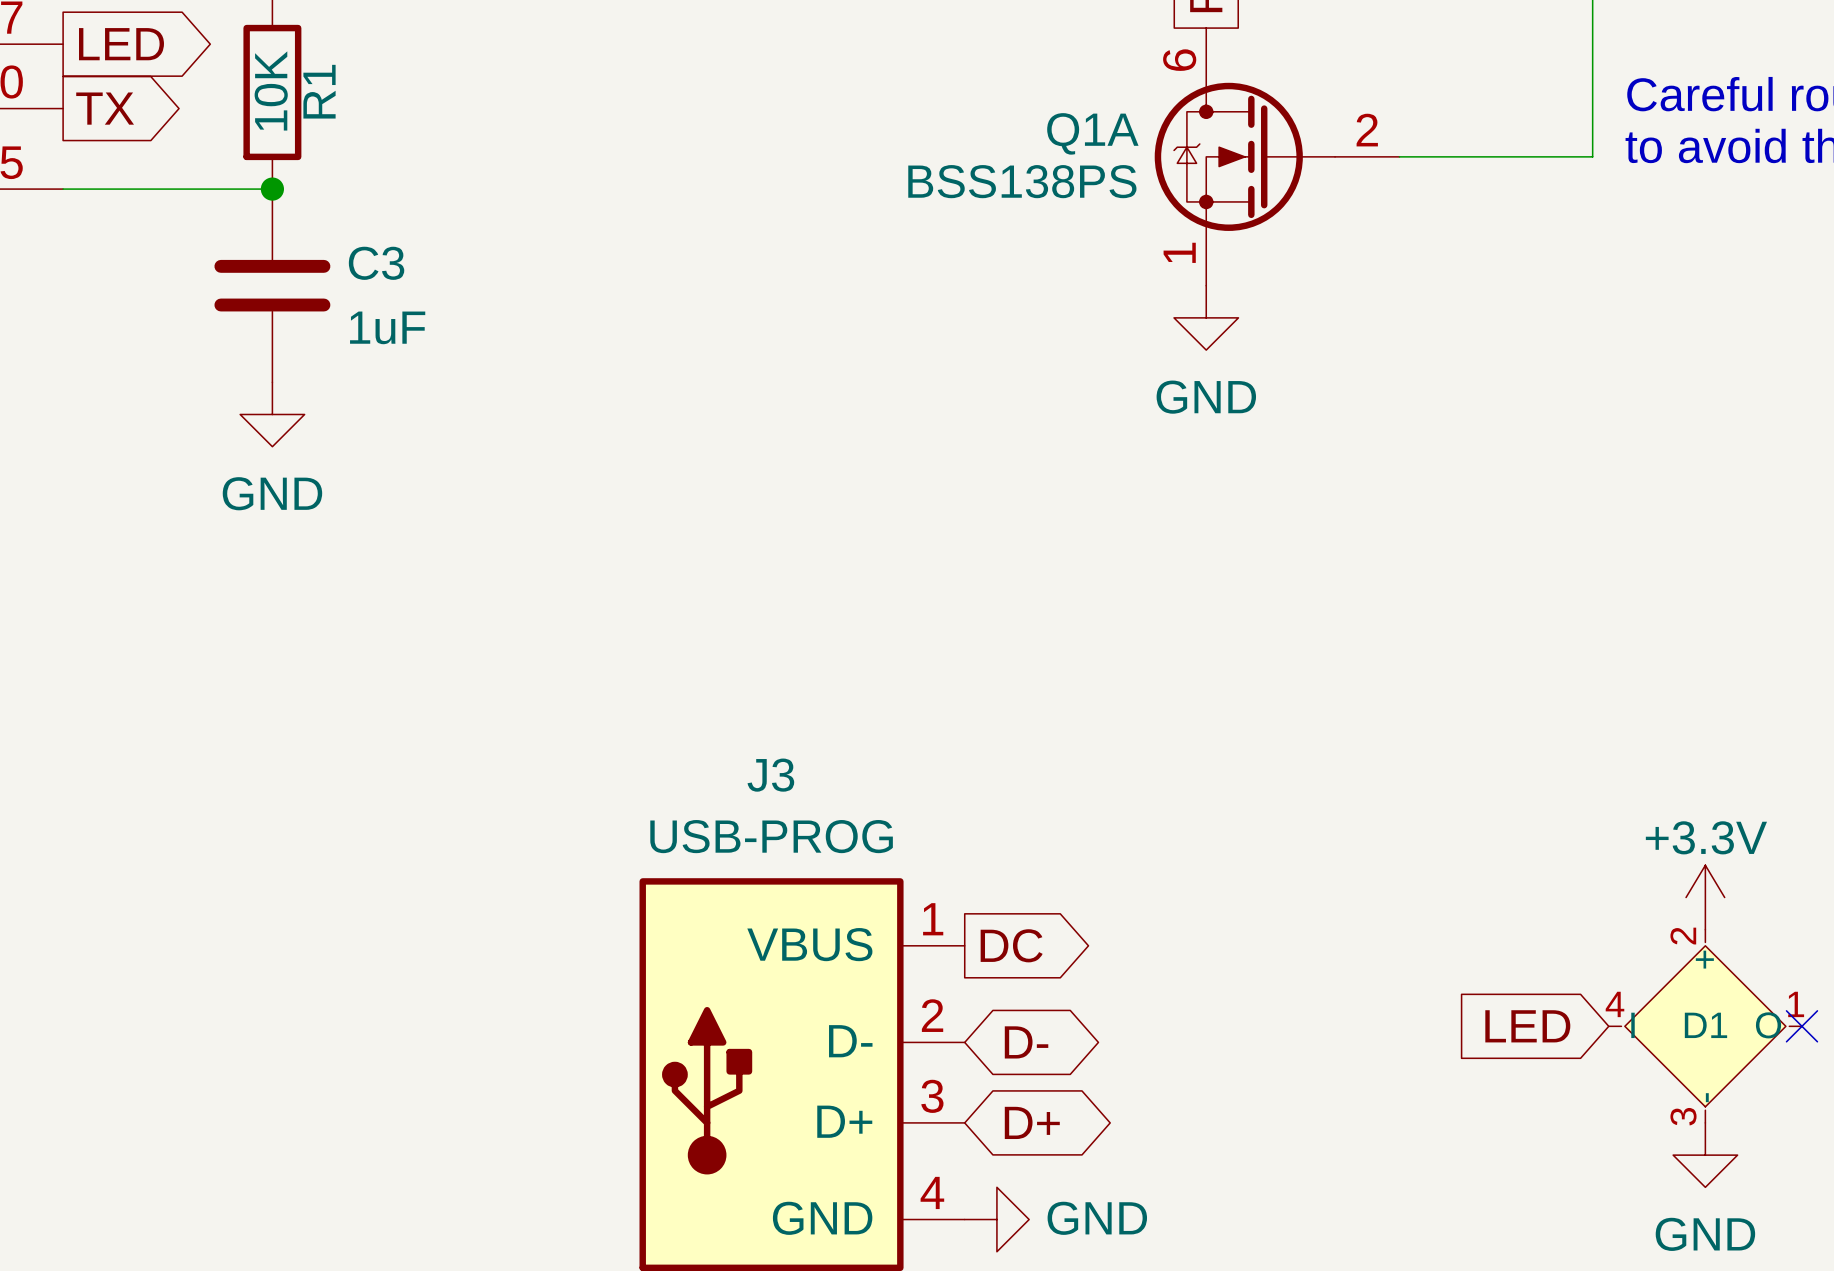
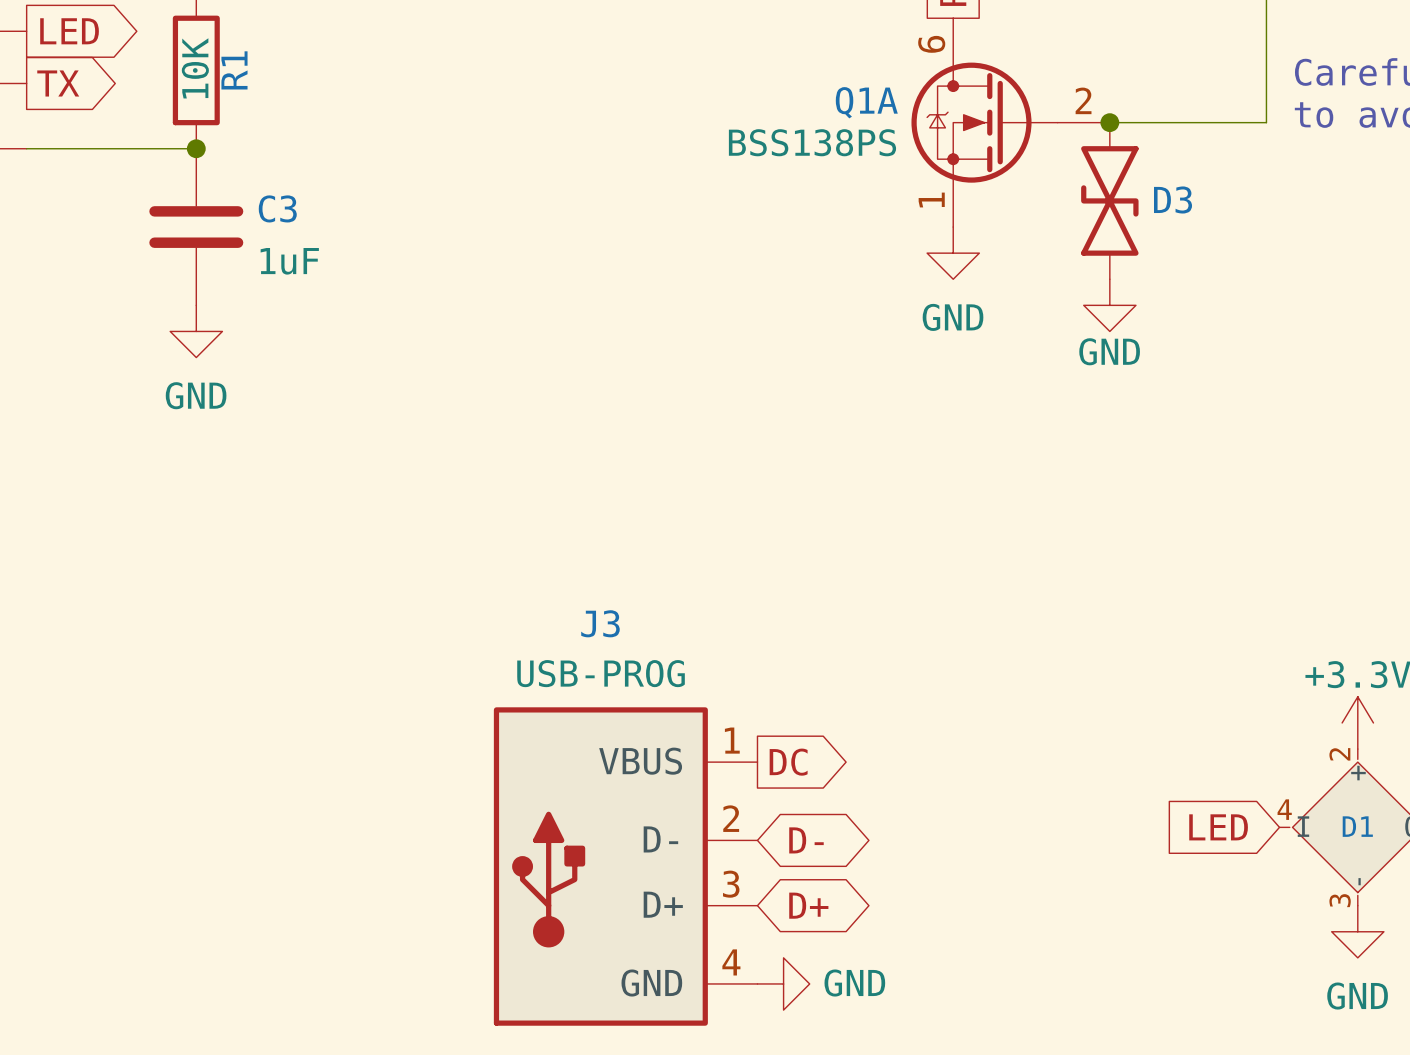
junction: none -> (1109, 122)
D3: none -> (1109, 200)
power symbol: none -> GND (1109, 305)

